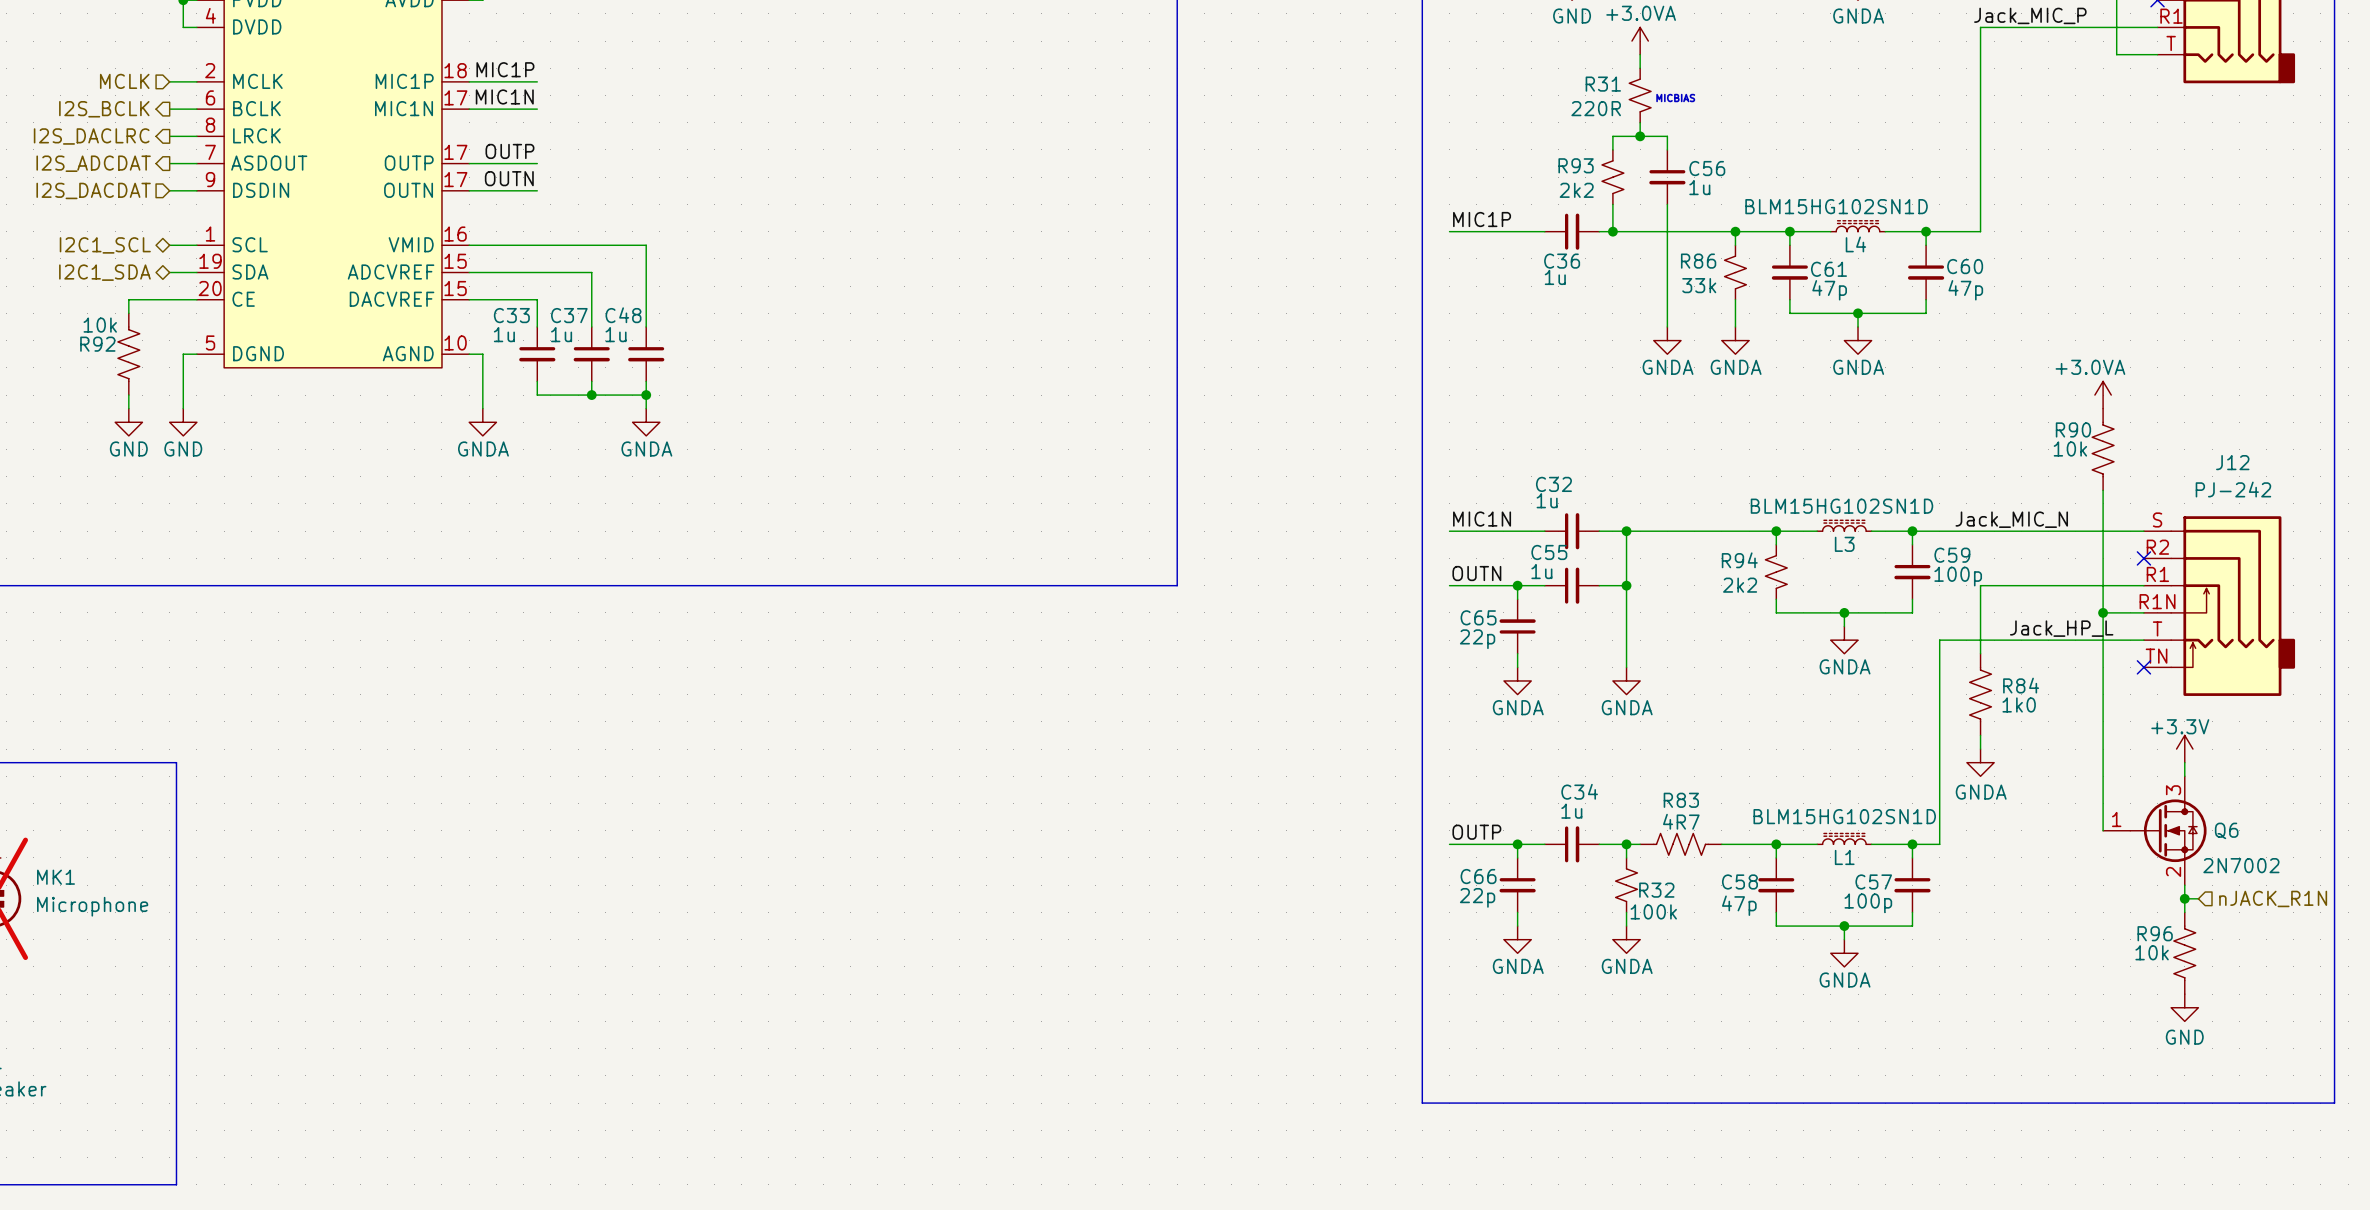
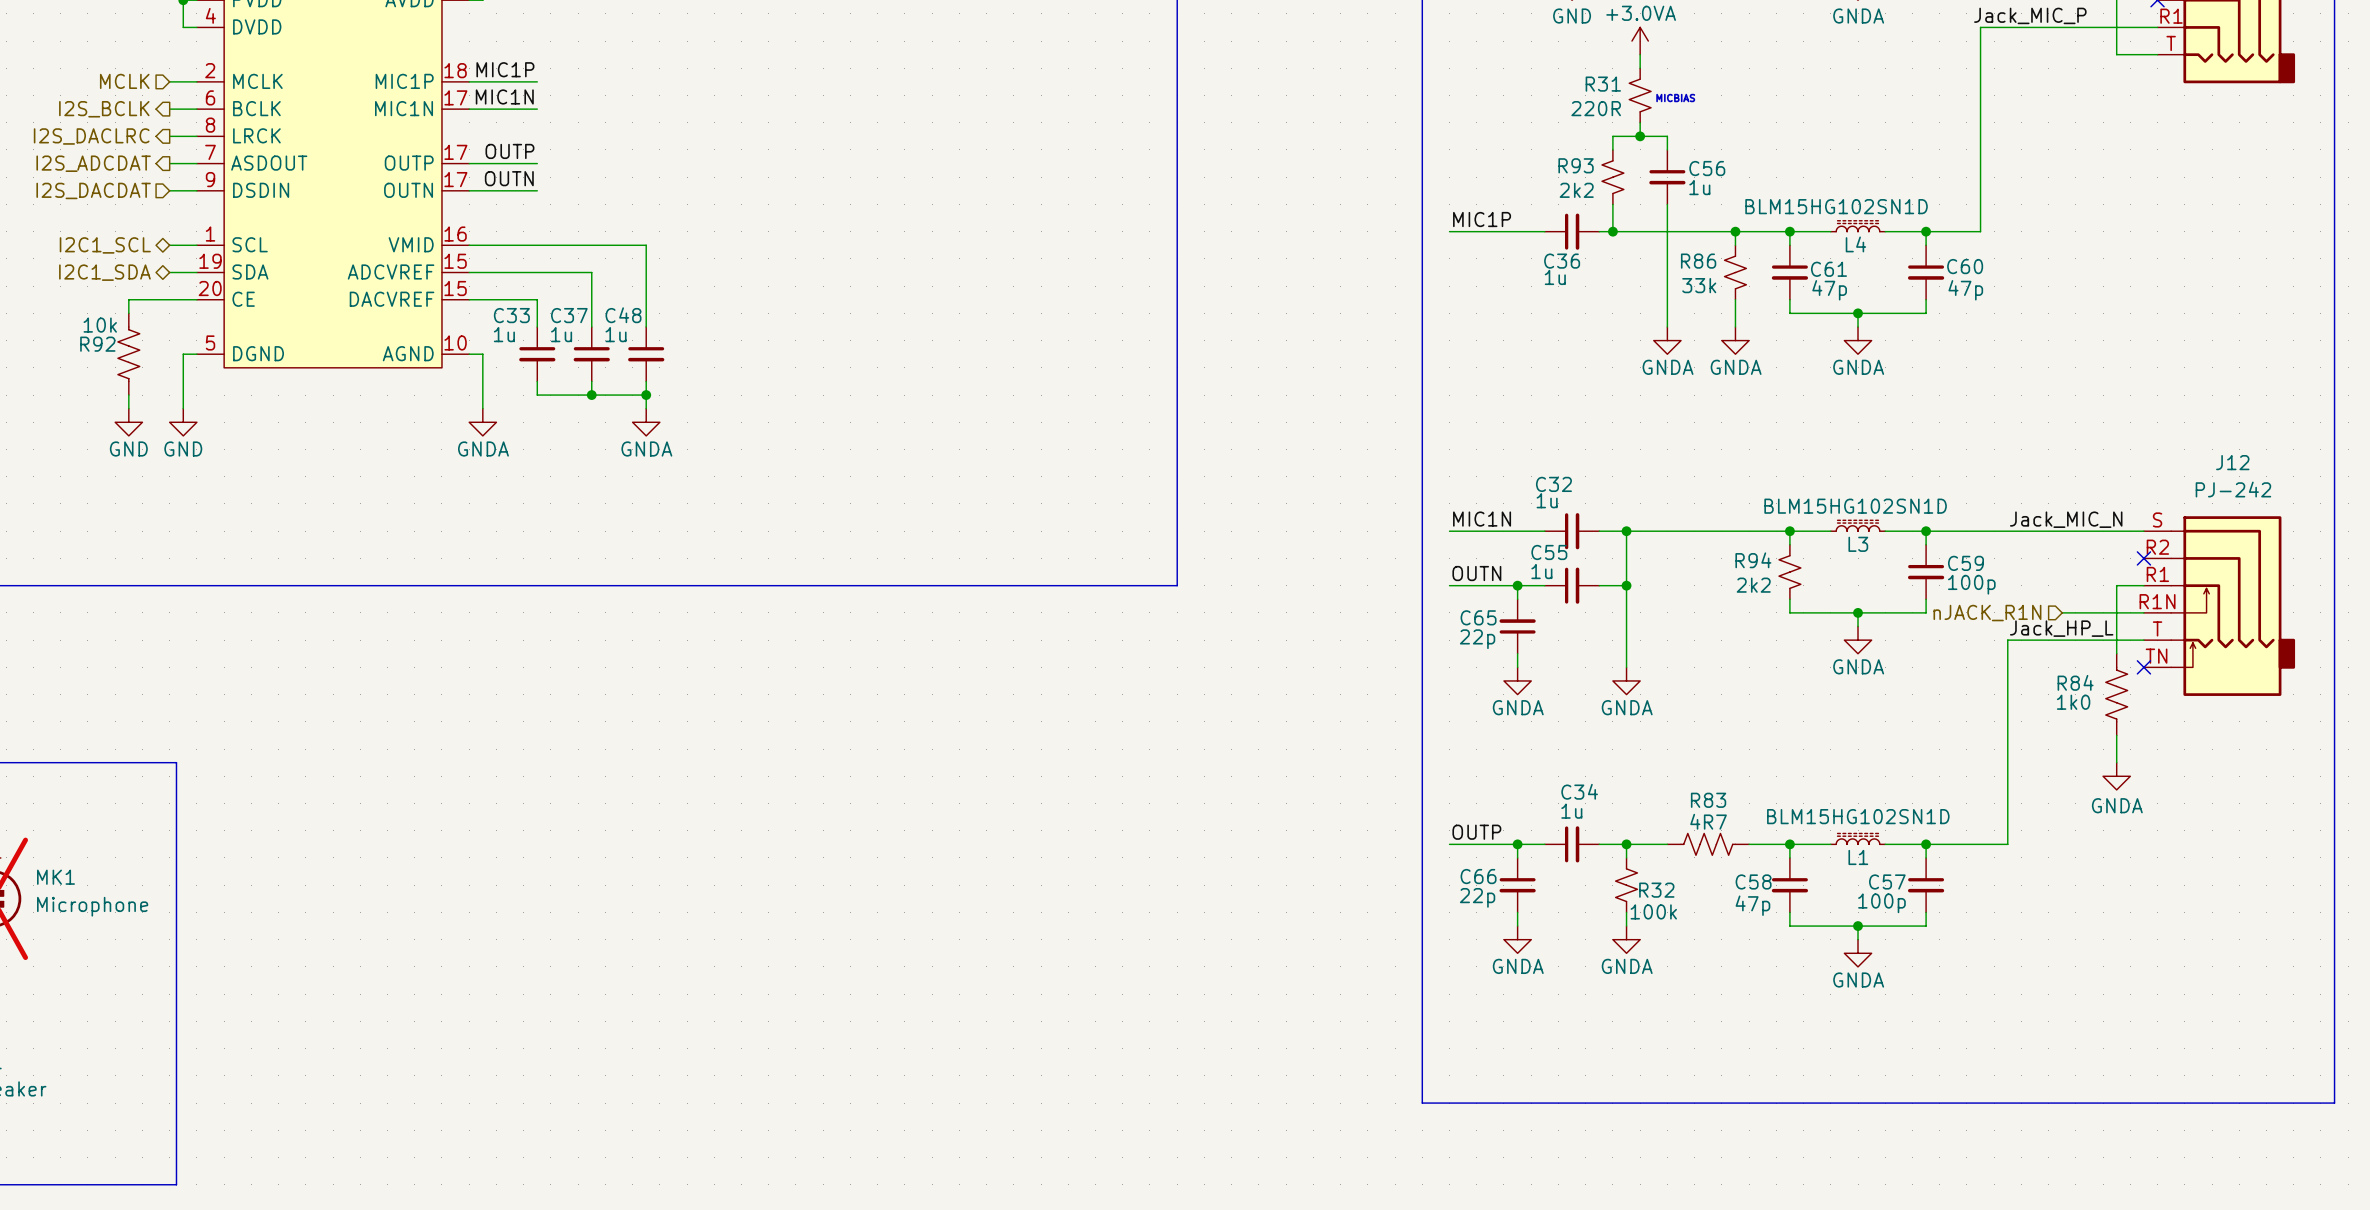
power symbol: +3.0VA (2103, 395) -> none
R90: 10k (2103, 449) -> none
wire: (2103, 490) (2103, 830) -> none
label position: Jack_MIC_N (2011, 519) -> Jack_MIC_N (2066, 519)
L3 position: (1844, 525) -> (1858, 525)
wire: (1776, 531) (1776, 544) -> (1789, 531) (1789, 544)
junction position: (1776, 531) -> (1789, 531)
wire: (1871, 531) (1885, 531) -> (1817, 531) (1830, 531)
wire: (1912, 531) (1912, 544) -> (1926, 531) (1926, 544)
junction position: (1912, 531) -> (1926, 531)
C59 name position: C59 (1952, 555) -> C59 (1965, 563)
R94 position: (1776, 572) -> (1789, 572)
C59 position: (1912, 572) -> (1926, 572)
C59 value position: 100p (1958, 576) -> 100p (1971, 584)
wire: (2116, 585) (1980, 585) (1980, 653) -> (2116, 585) (2116, 653)
wire: (1776, 599) (1776, 612) (1789, 612) -> (1789, 599) (1789, 612)
wire: (1912, 599) (1912, 612) -> (1926, 599) (1926, 612) (1912, 612)
wire: (1844, 612) (1844, 626) -> (1858, 612) (1858, 626)
junction position: (1844, 612) -> (1858, 612)
wire: none -> (2062, 612) (2103, 612)
junction: (2103, 612) -> none
hierarchical label: none -> nJACK_R1N (1987, 613)
power symbol position: GNDA (1844, 640) -> GNDA (1858, 640)
wire: (2007, 640) (1939, 640) (1939, 844) -> (2007, 640) (2007, 844) (1939, 844)
R84 name position: R84 (2021, 685) -> R84 (2075, 682)
R84 position: (1980, 694) -> (2116, 694)
R84 value position: 1k0 (2019, 704) -> 1k0 (2073, 702)
wire: (1980, 735) (1980, 749) -> none
power symbol: +3.3V (2184, 749) -> none
power symbol: GNDA (1980, 762) -> none
wire: (2184, 762) (2184, 776) -> none
power symbol: none -> GNDA (2116, 776)
Q6: 2N7002 (2154, 830) -> none
L1 position: (1844, 838) -> (1858, 838)
R83 position: (1681, 844) -> (1708, 844)
wire: (1776, 844) (1776, 857) -> (1789, 844) (1789, 857)
junction position: (1776, 844) -> (1789, 844)
wire: (1871, 844) (1885, 844) -> (1817, 844) (1830, 844)
wire: (1912, 844) (1912, 857) -> (1926, 844) (1926, 857)
junction position: (1912, 844) -> (1926, 844)
C58 position: (1776, 885) -> (1789, 885)
C57 position: (1912, 885) -> (1926, 885)
wire: (2184, 885) (2184, 912) -> (2116, 735) (2116, 762)
wire: (2184, 898) (2198, 898) -> none
junction: (2184, 898) -> none
hierarchical label: nJACK_R1N (2273, 898) -> none
wire: (1776, 912) (1776, 926) (1789, 926) -> (1789, 912) (1789, 926)
wire: (1912, 912) (1912, 926) -> (1926, 912) (1926, 926) (1912, 926)
wire: (1844, 926) (1844, 939) -> (1858, 926) (1858, 939)
junction position: (1844, 926) -> (1858, 926)
power symbol position: GNDA (1844, 953) -> GNDA (1858, 953)
R96: 10k (2184, 953) -> none
power symbol: GND (2184, 1007) -> none

